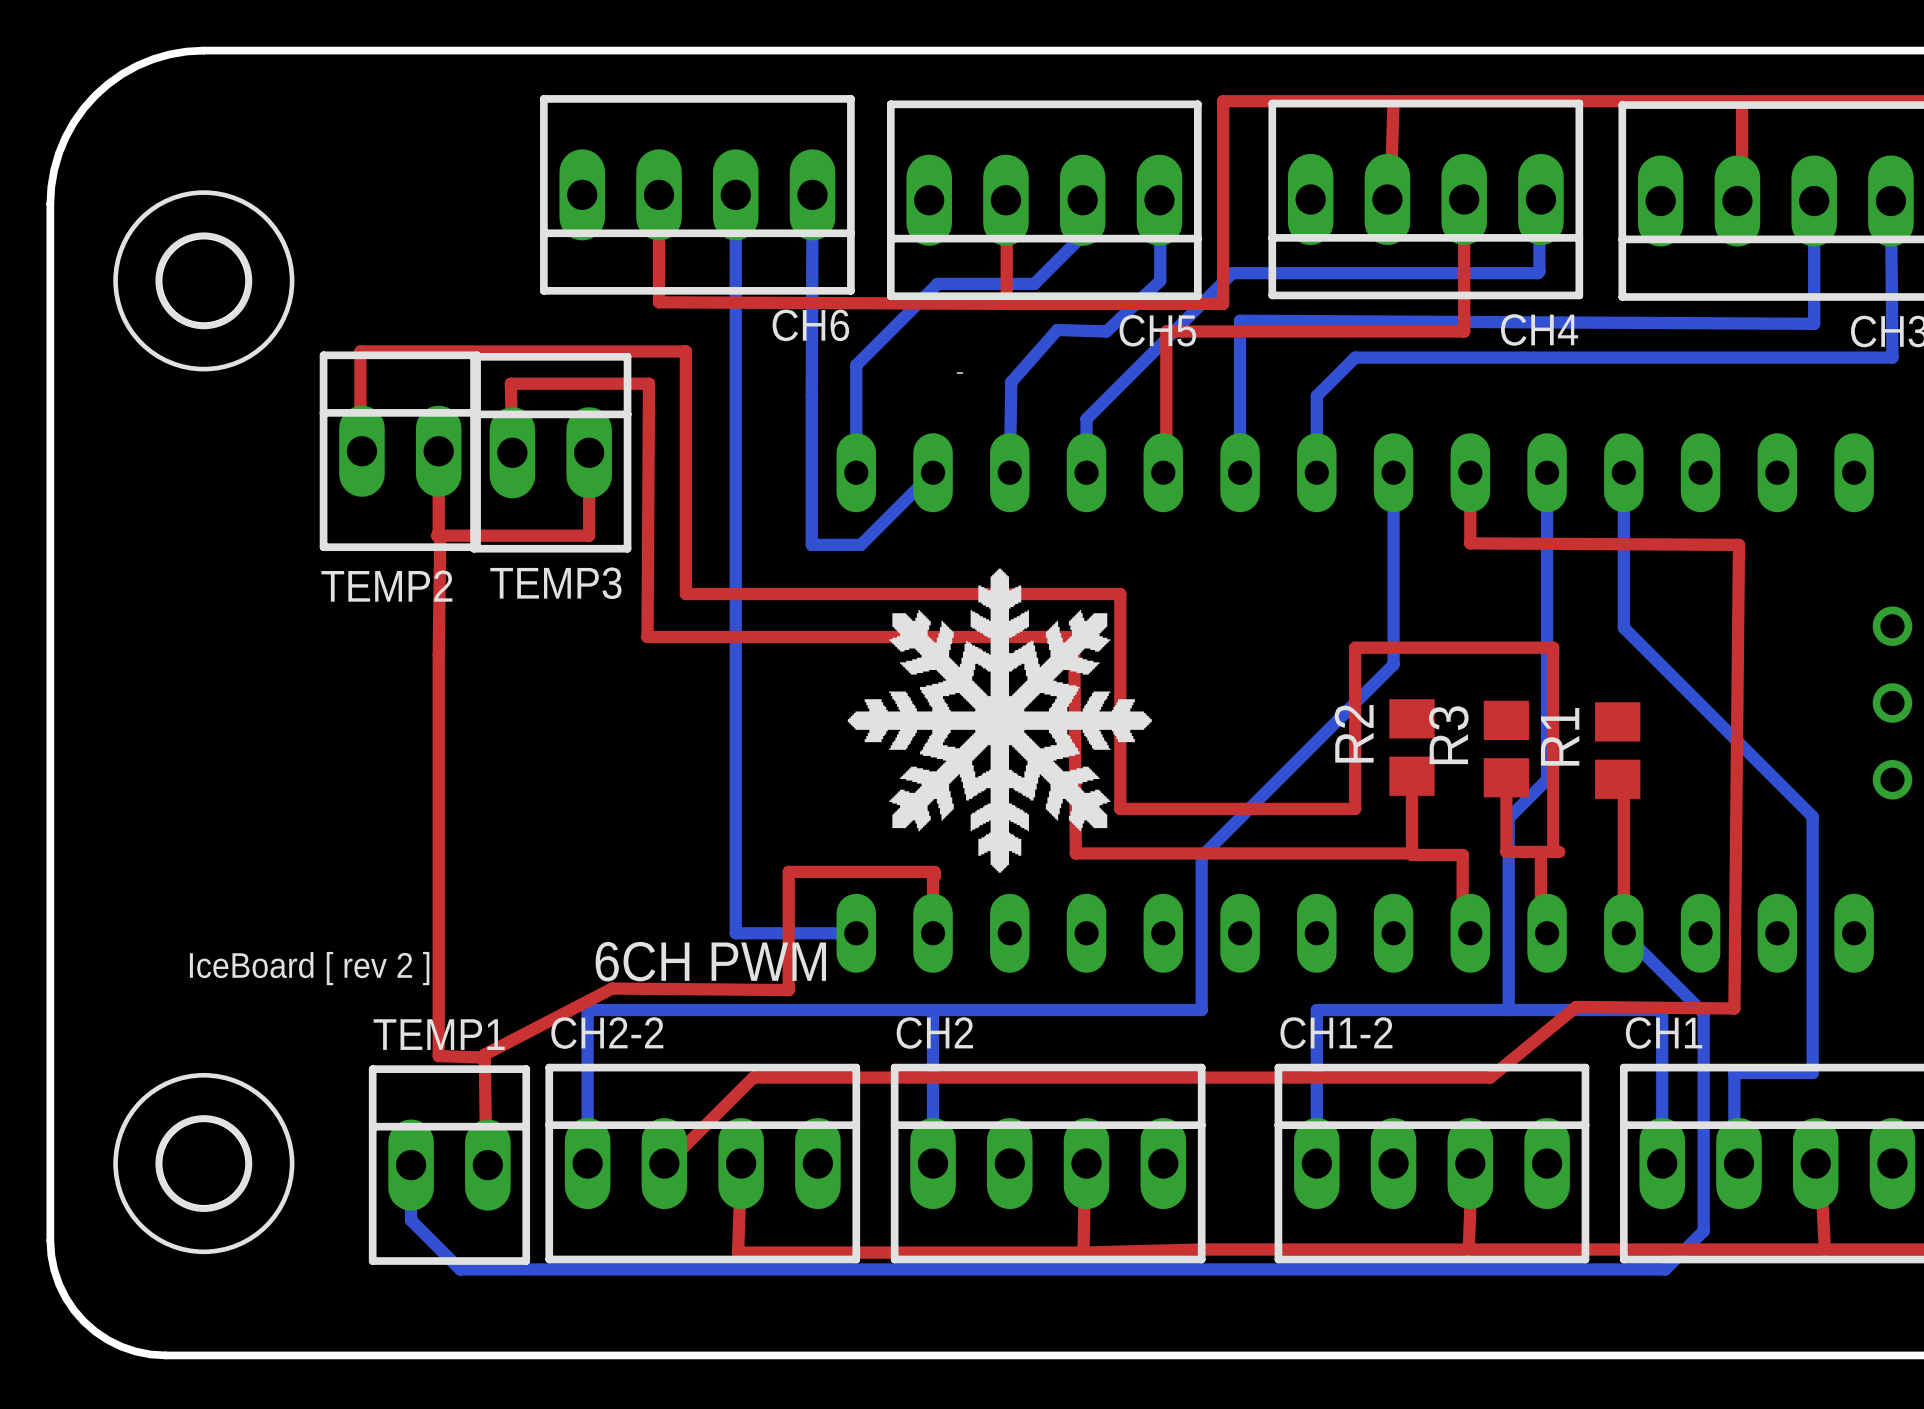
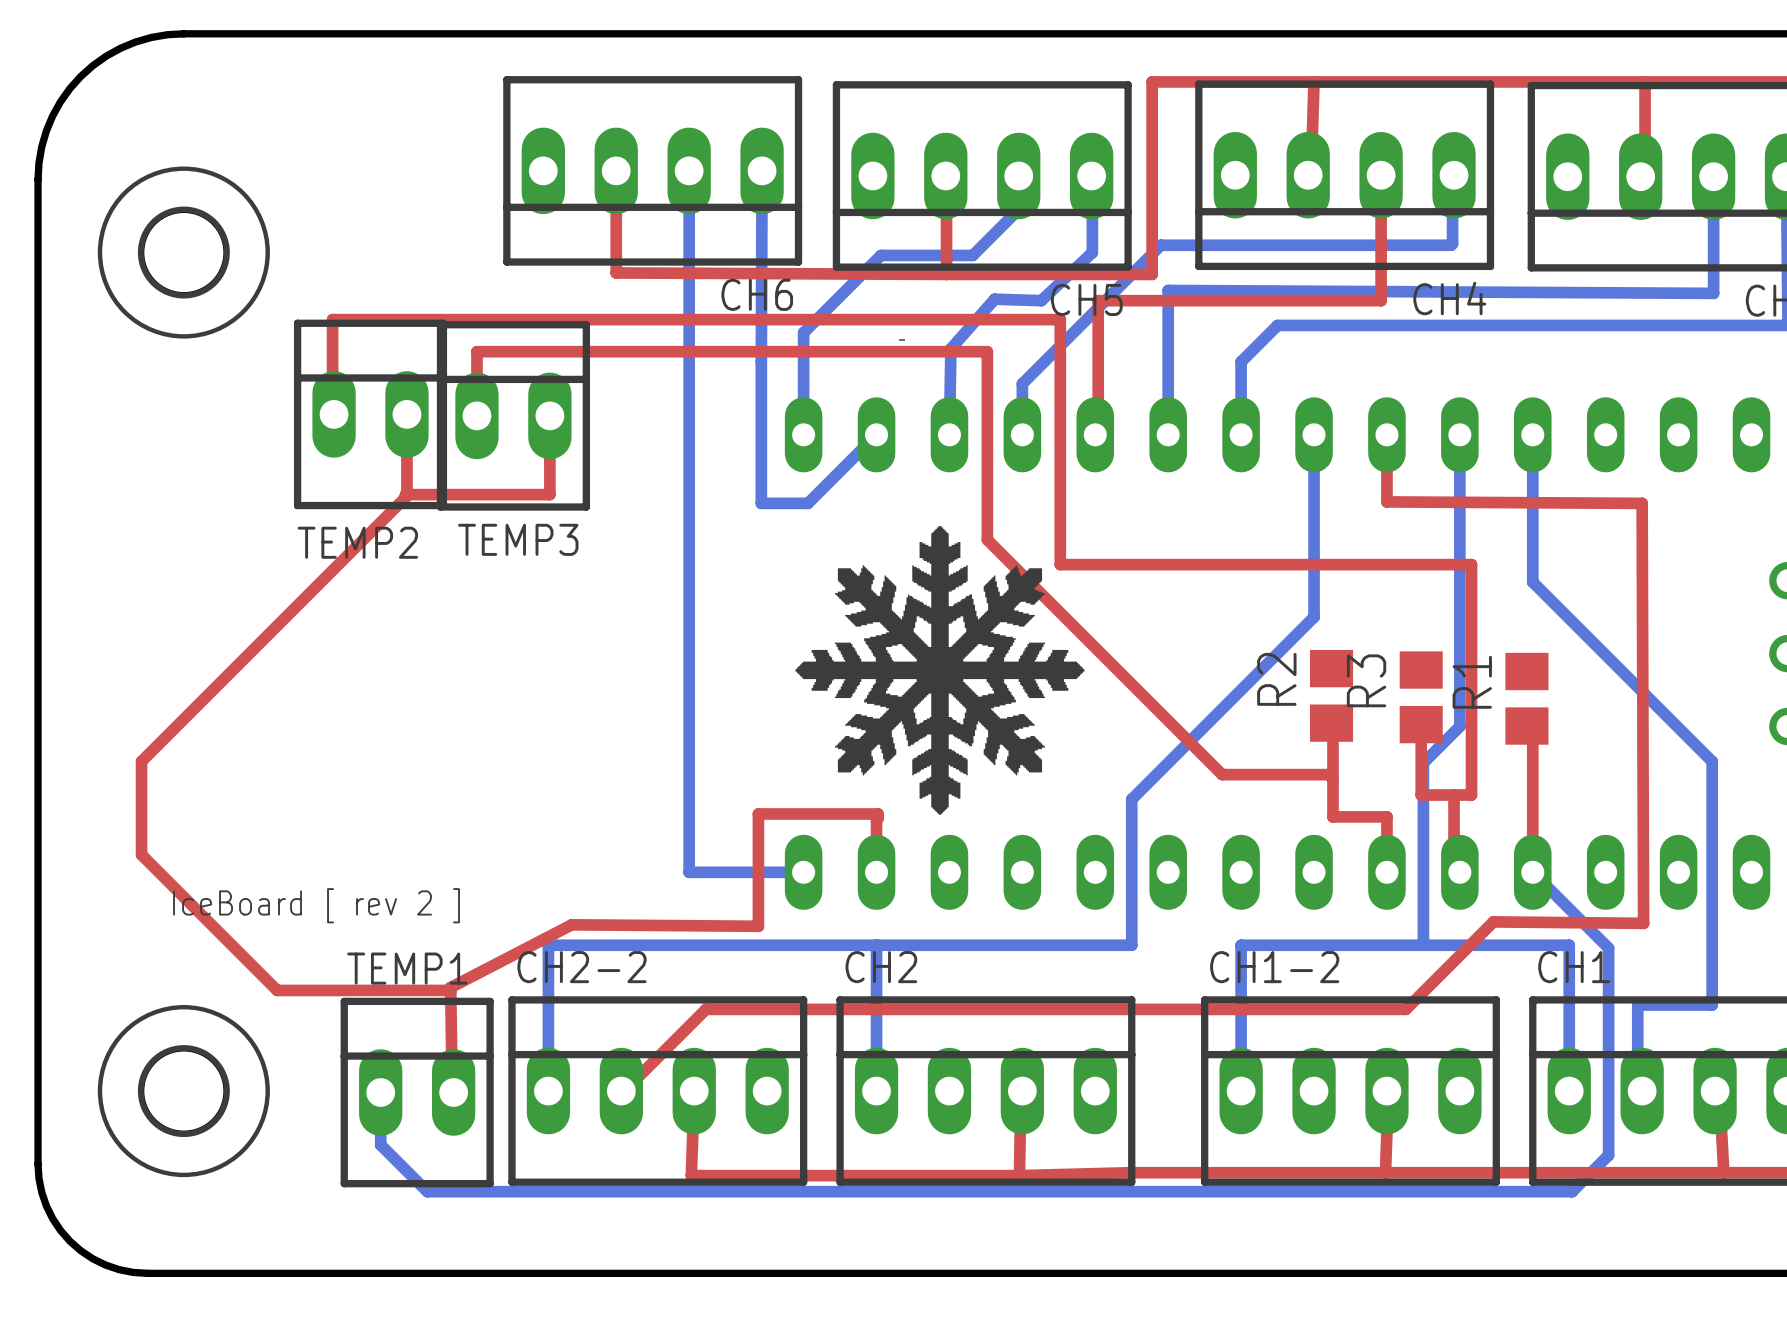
top track: (685, 351) (685, 594) (1120, 594) (1120, 808) (1355, 808) (1355, 647) (1553, 647) (1553, 851) -> (641, 319) (1060, 319) (1060, 564) (1471, 564) (1471, 795)
top track: (512, 452) (510, 383) (649, 383) (647, 636) (1074, 636) (1075, 853) (1411, 853) -> (476, 415) (476, 351) (987, 351) (987, 539) (1222, 774) (1328, 774) (1332, 778)
top track: (440, 535) (438, 1056) (484, 1057) -> (408, 494) (141, 761) (141, 854) (277, 990) (450, 990)
top track: (1738, 544) (1734, 1008) (1576, 1006) (1490, 1077) -> (1642, 503) (1643, 923) (1493, 921) (1405, 1009)
top track: (1411, 776) (1411, 854) (1462, 854) (1462, 933) (1470, 933) -> (1331, 723) (1332, 816) (1386, 816) (1386, 872)
top track: (808, 871) (788, 871) (788, 990) (612, 988) -> (758, 813) (758, 926) (571, 924)
text: 6CH PWM (710, 961) -> none

